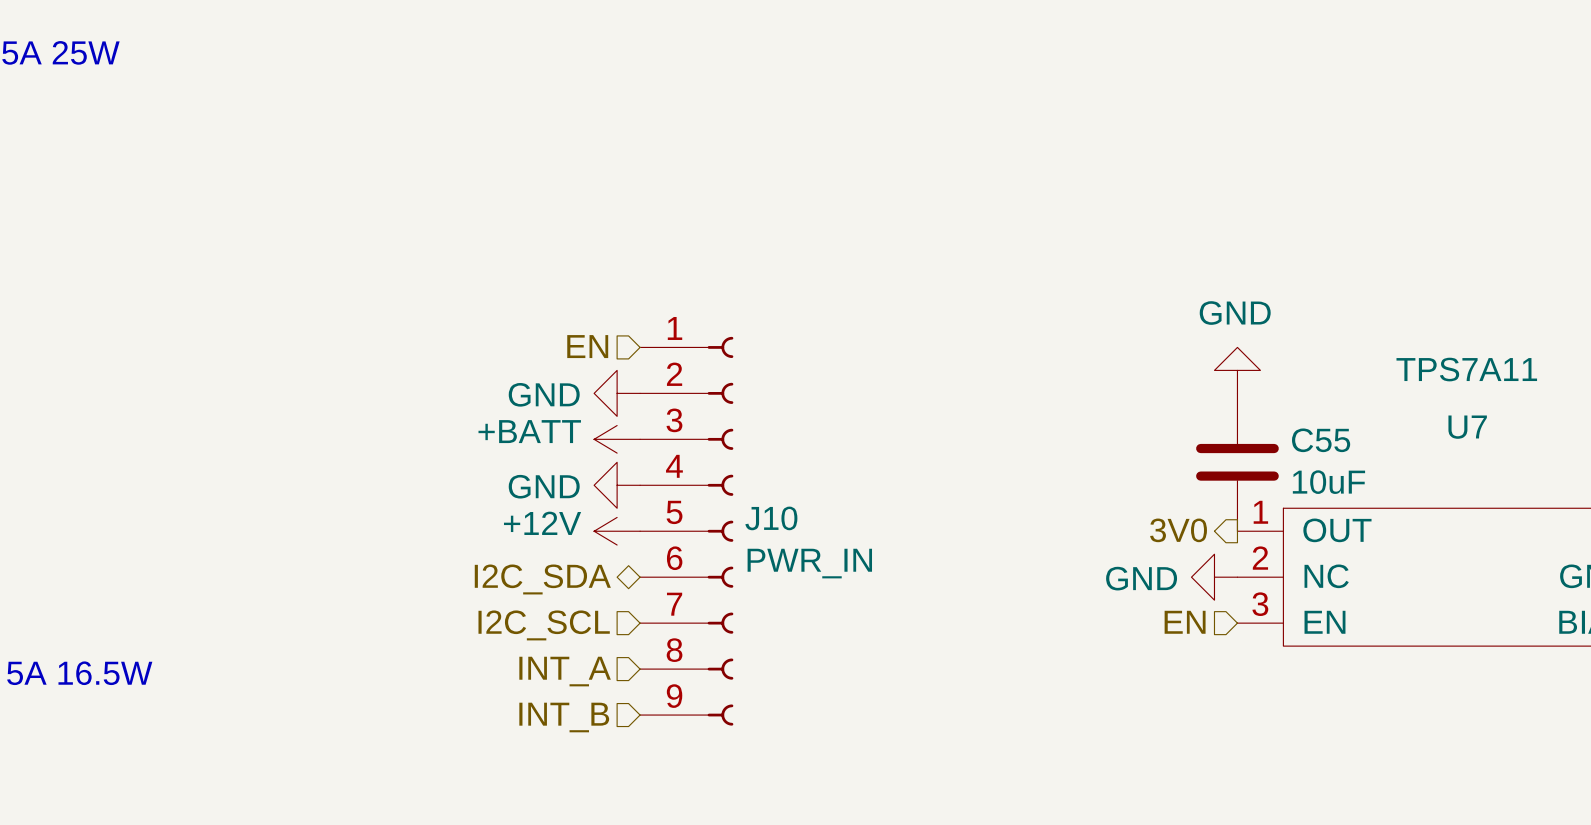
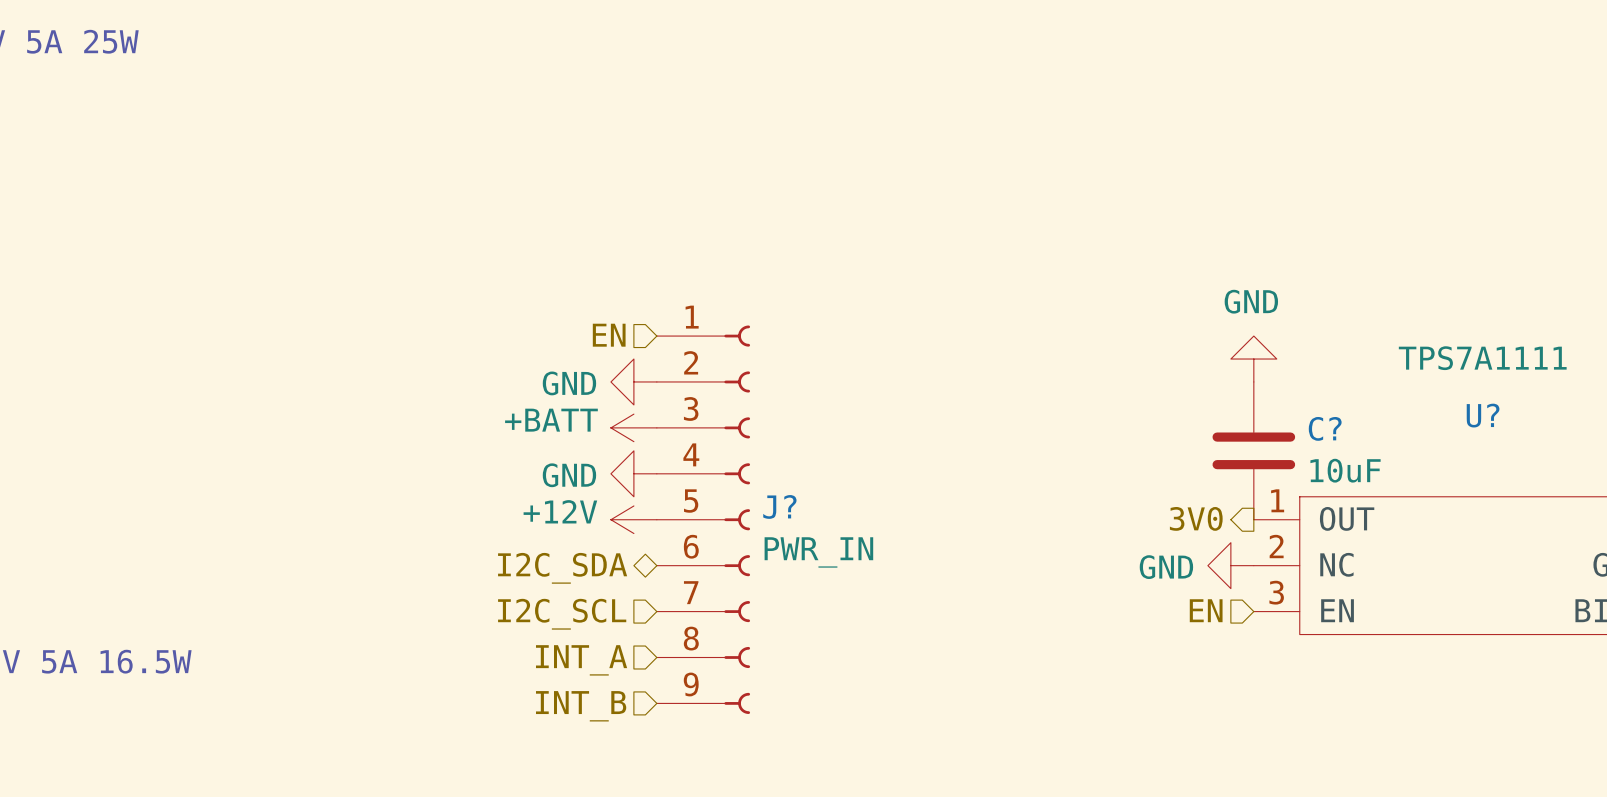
U7 value: TPS7A11 (1466, 369) -> TPS7A1111 (1482, 358)
U7 name: U7 (1467, 427) -> U? (1483, 415)
C55 name: C55 (1321, 440) -> C? (1325, 428)
J10 name: J10 (771, 518) -> J? (779, 506)

